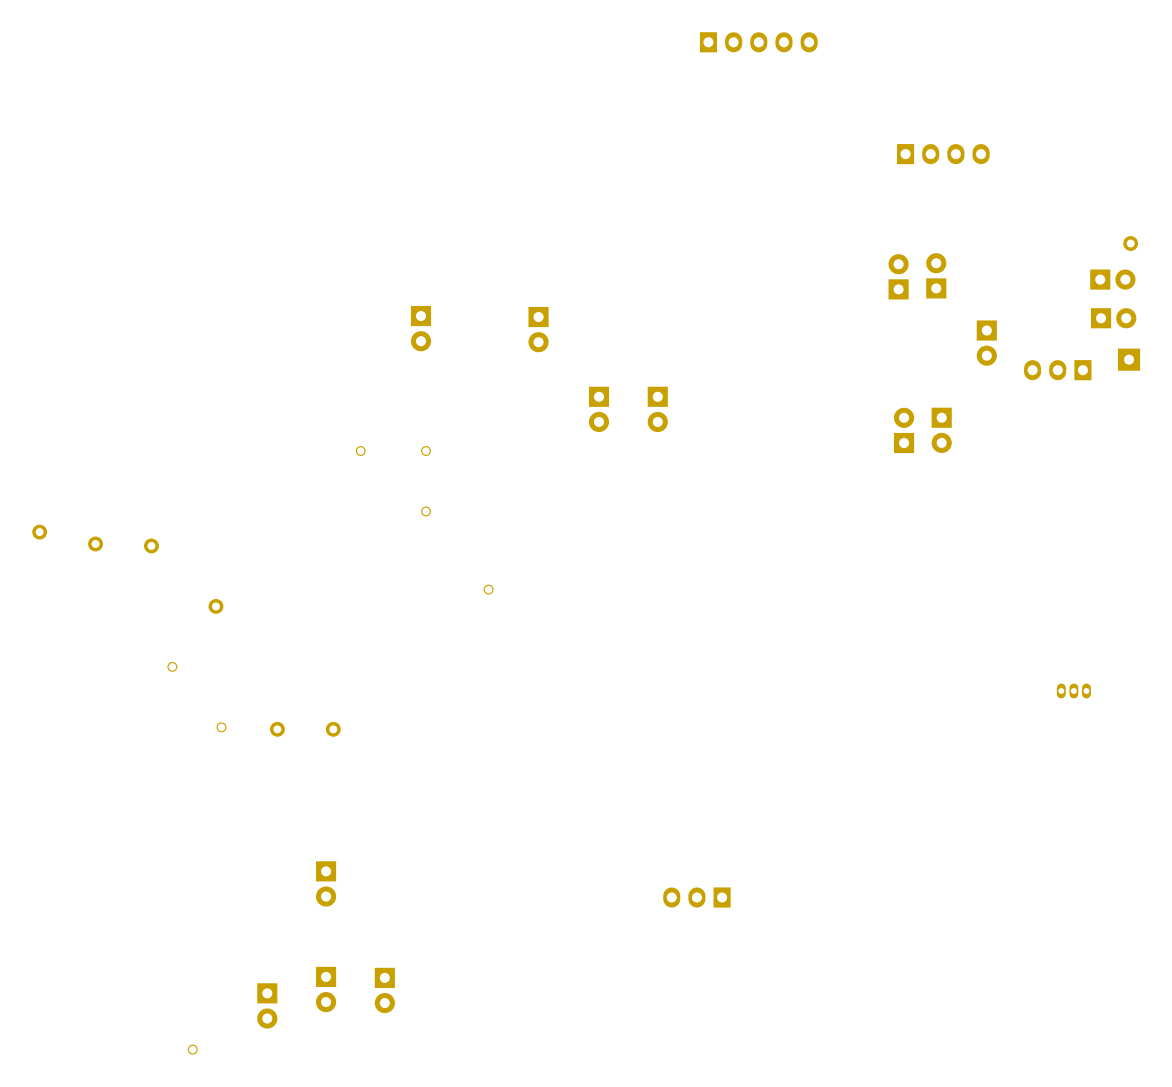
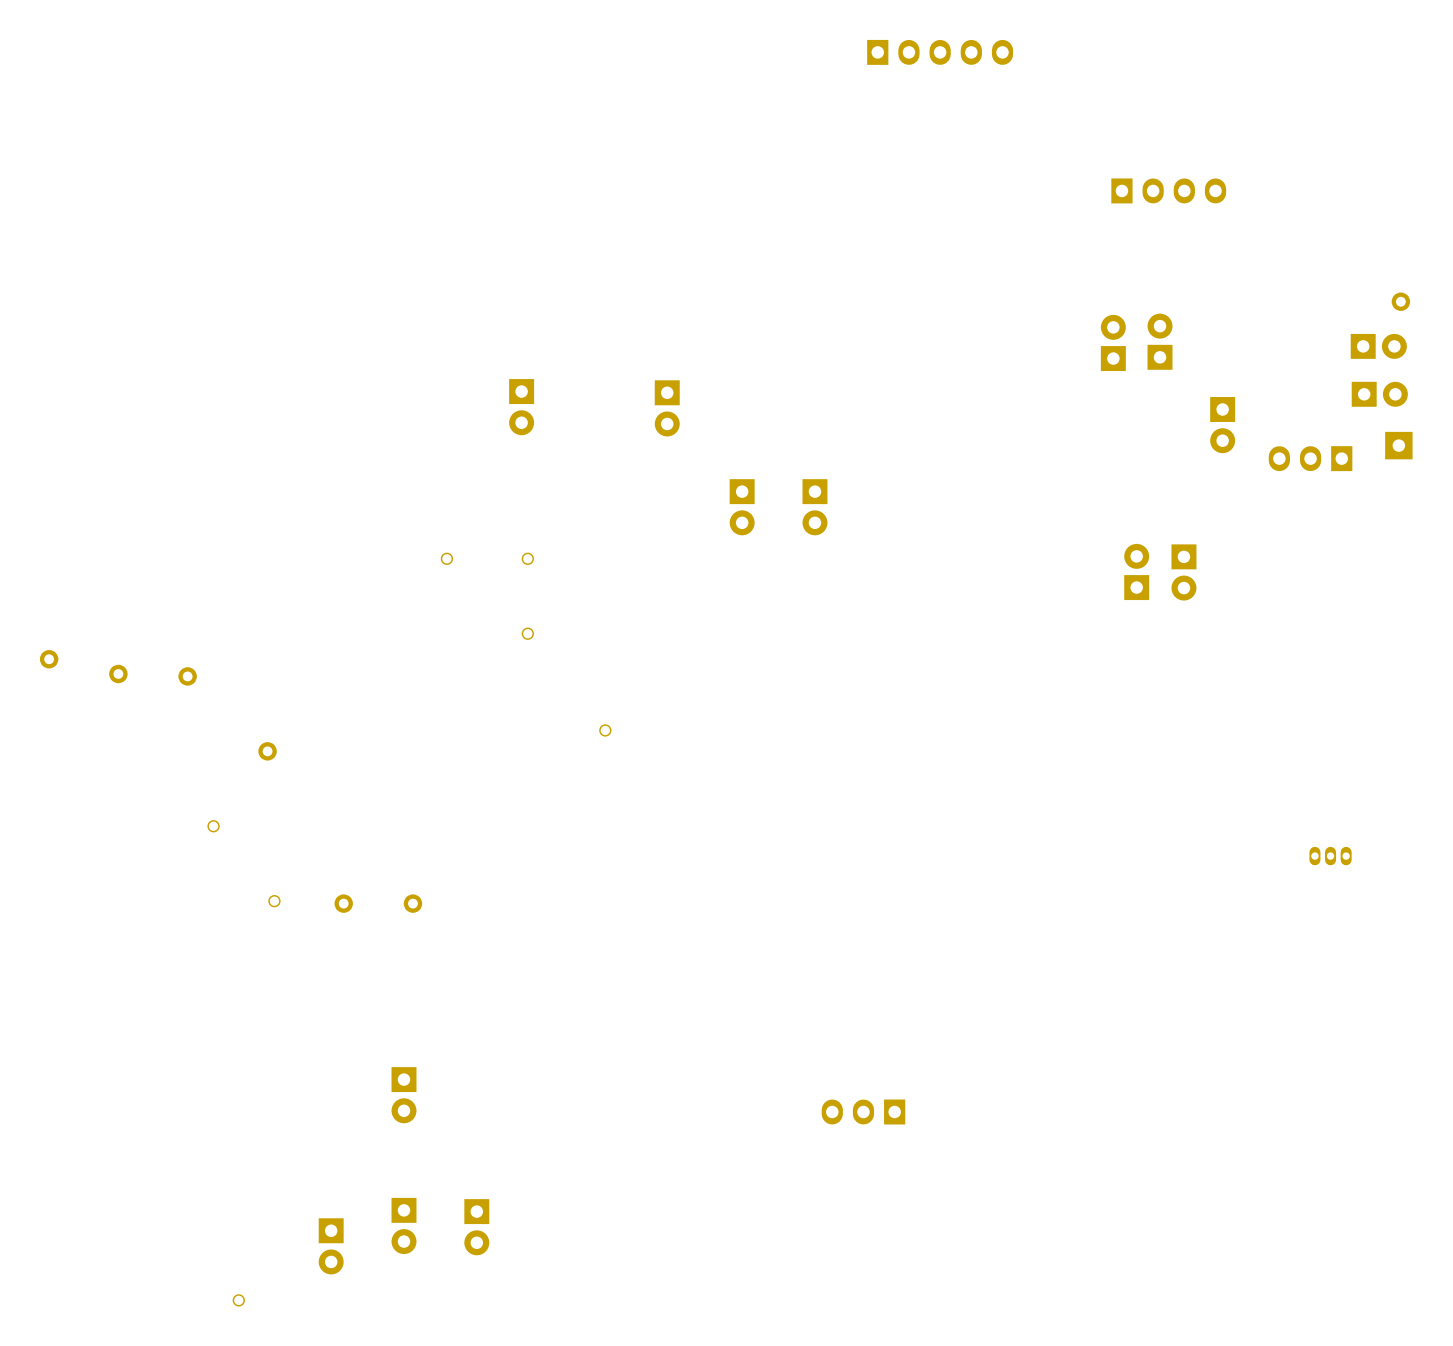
part: (904, 430) -> none
part: (941, 430) -> none
part: none -> (1136, 571)
part: none -> (1183, 572)

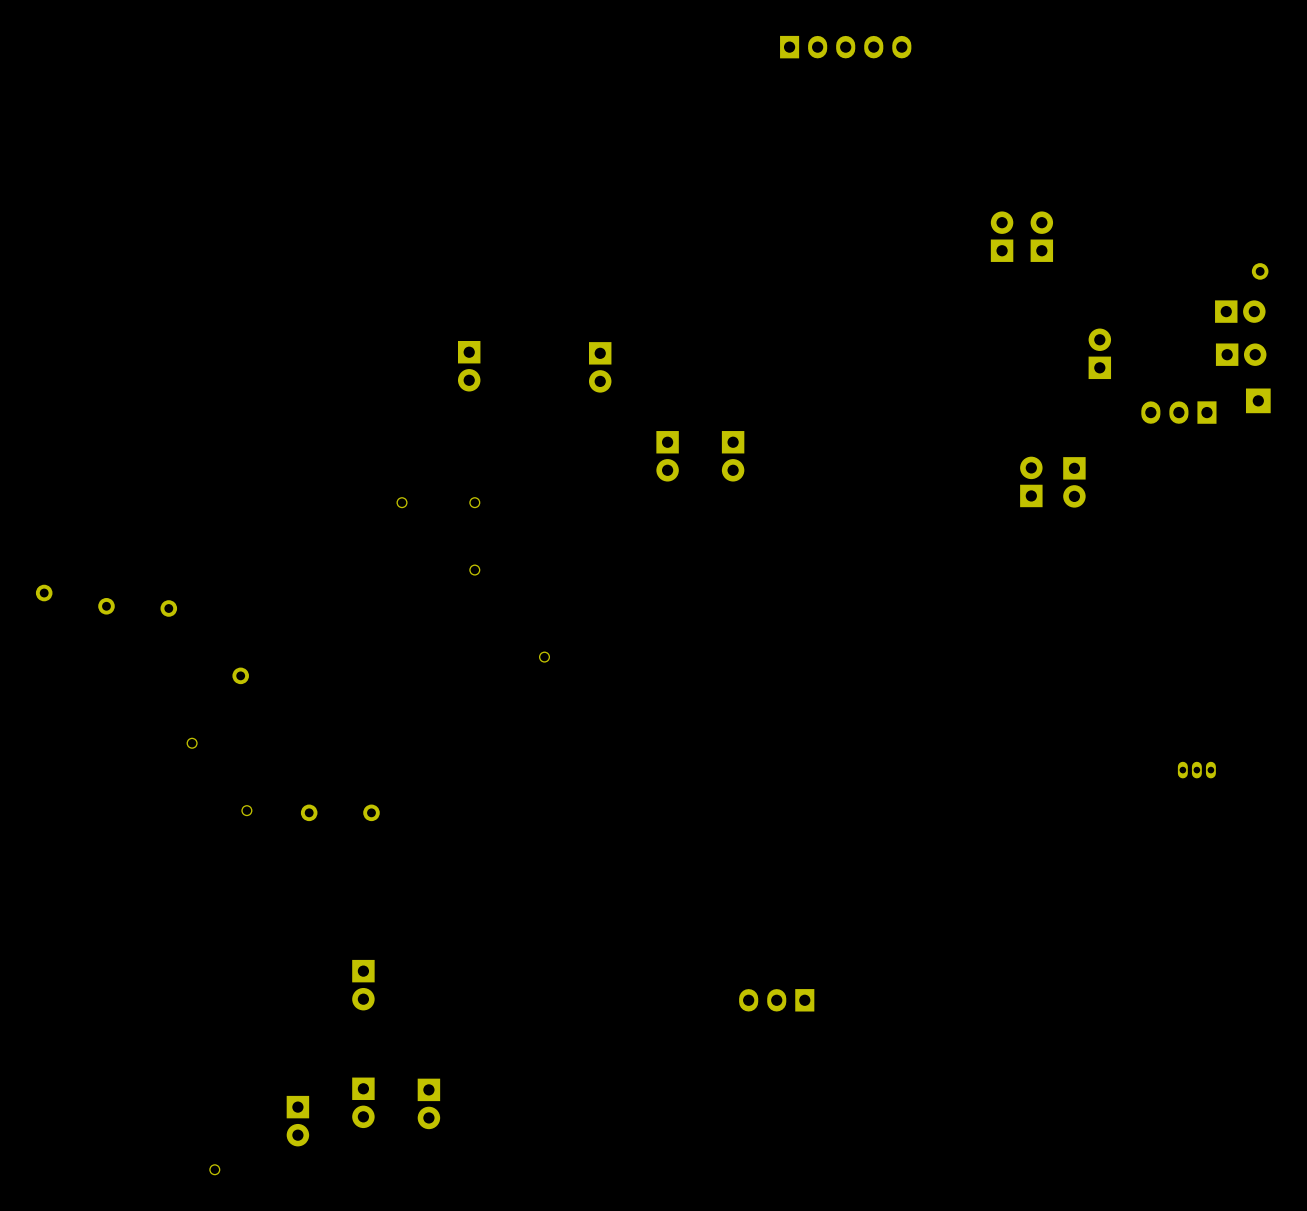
part: (1168, 190) -> none
part: none -> (1002, 236)
part: none -> (1041, 236)
part: (1160, 341) -> none
part: (1113, 342) -> none
part rotation: 0° (1222, 425) -> 180° (1099, 353)
part: none -> (1031, 481)
part: none -> (1074, 482)
part: (1136, 571) -> none
part: (1183, 572) -> none

